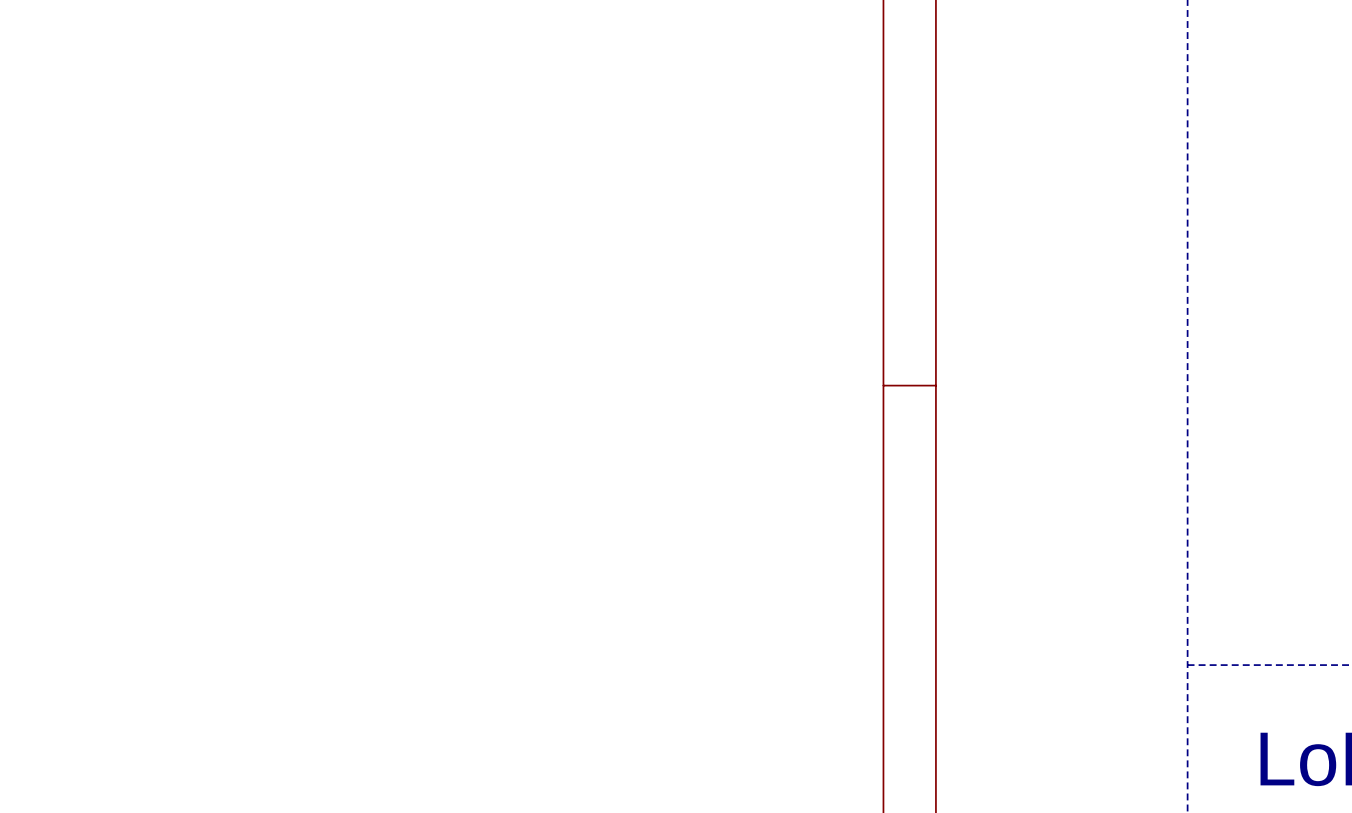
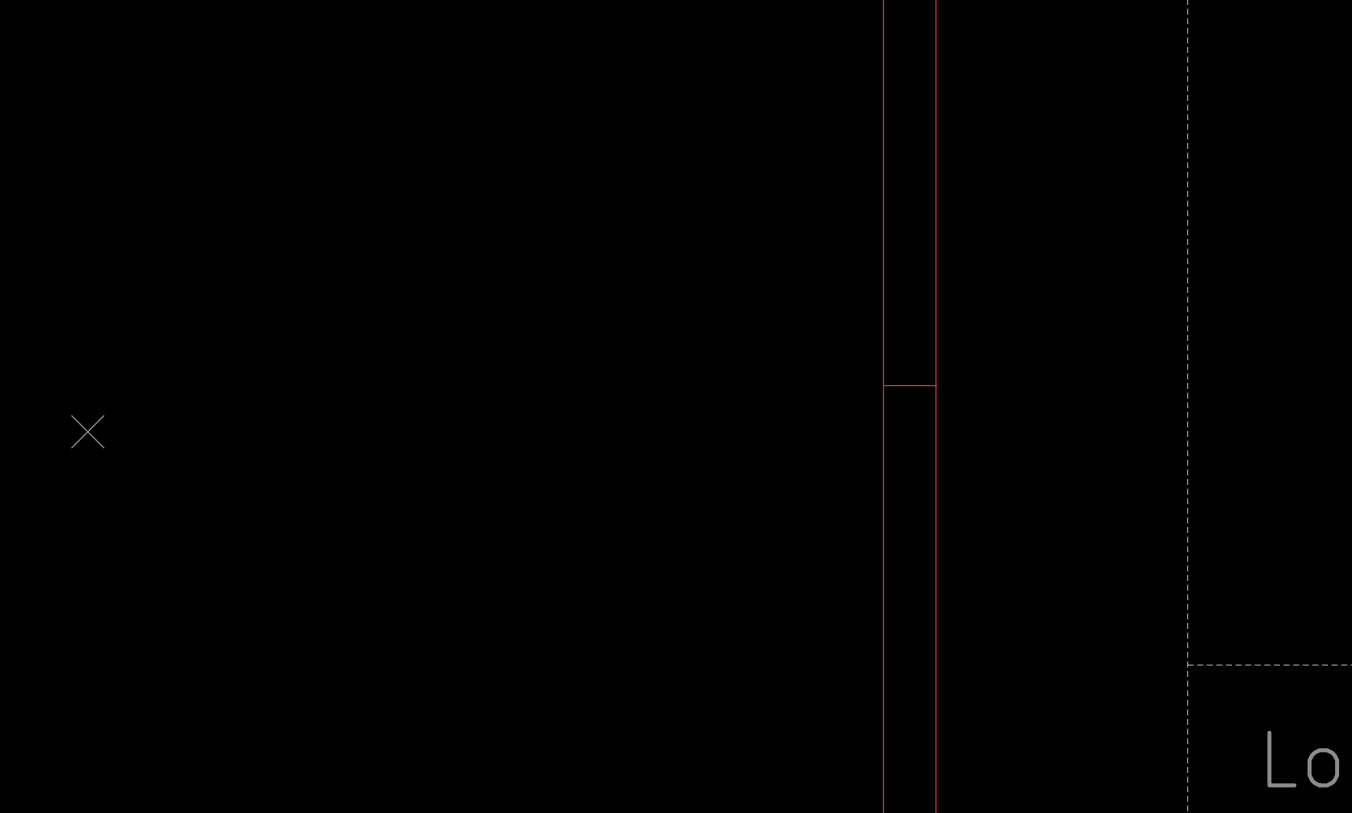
no-connect mark: none -> (87, 431)

